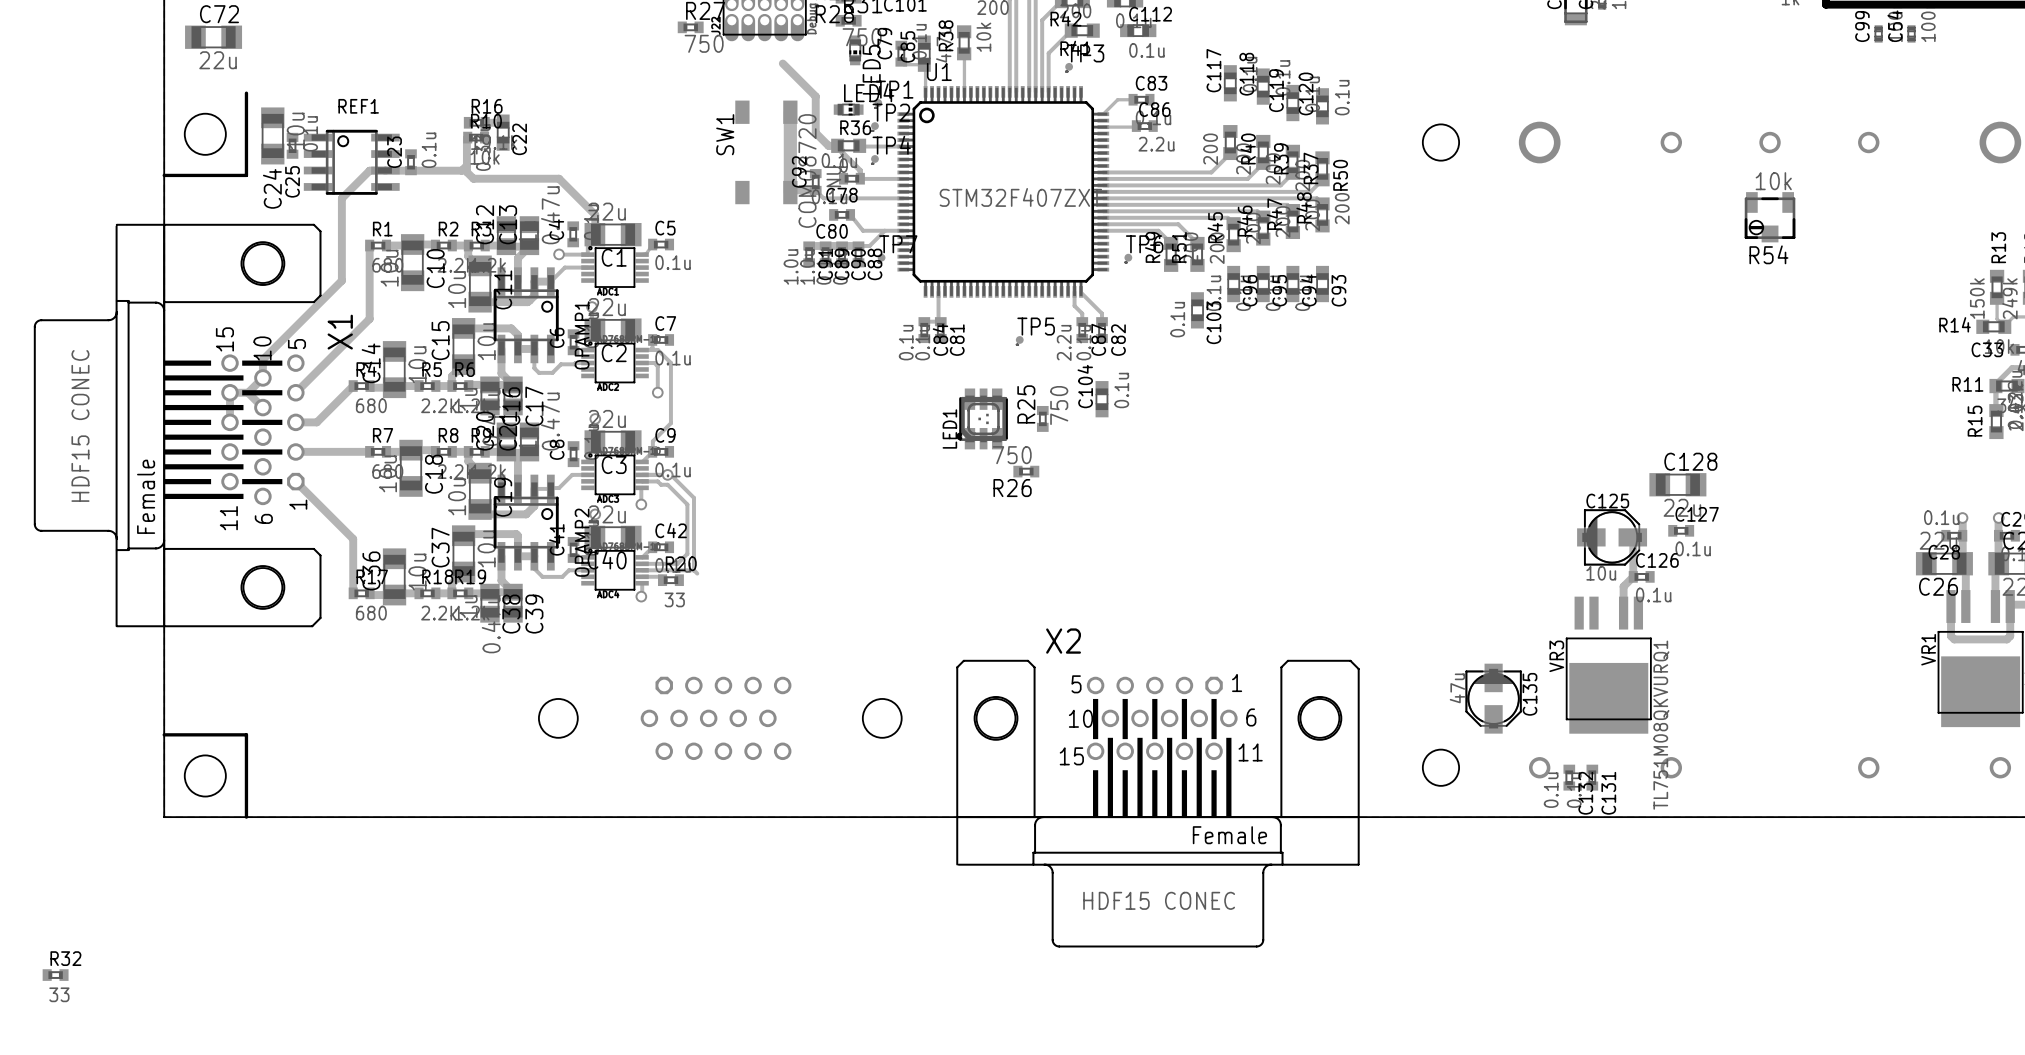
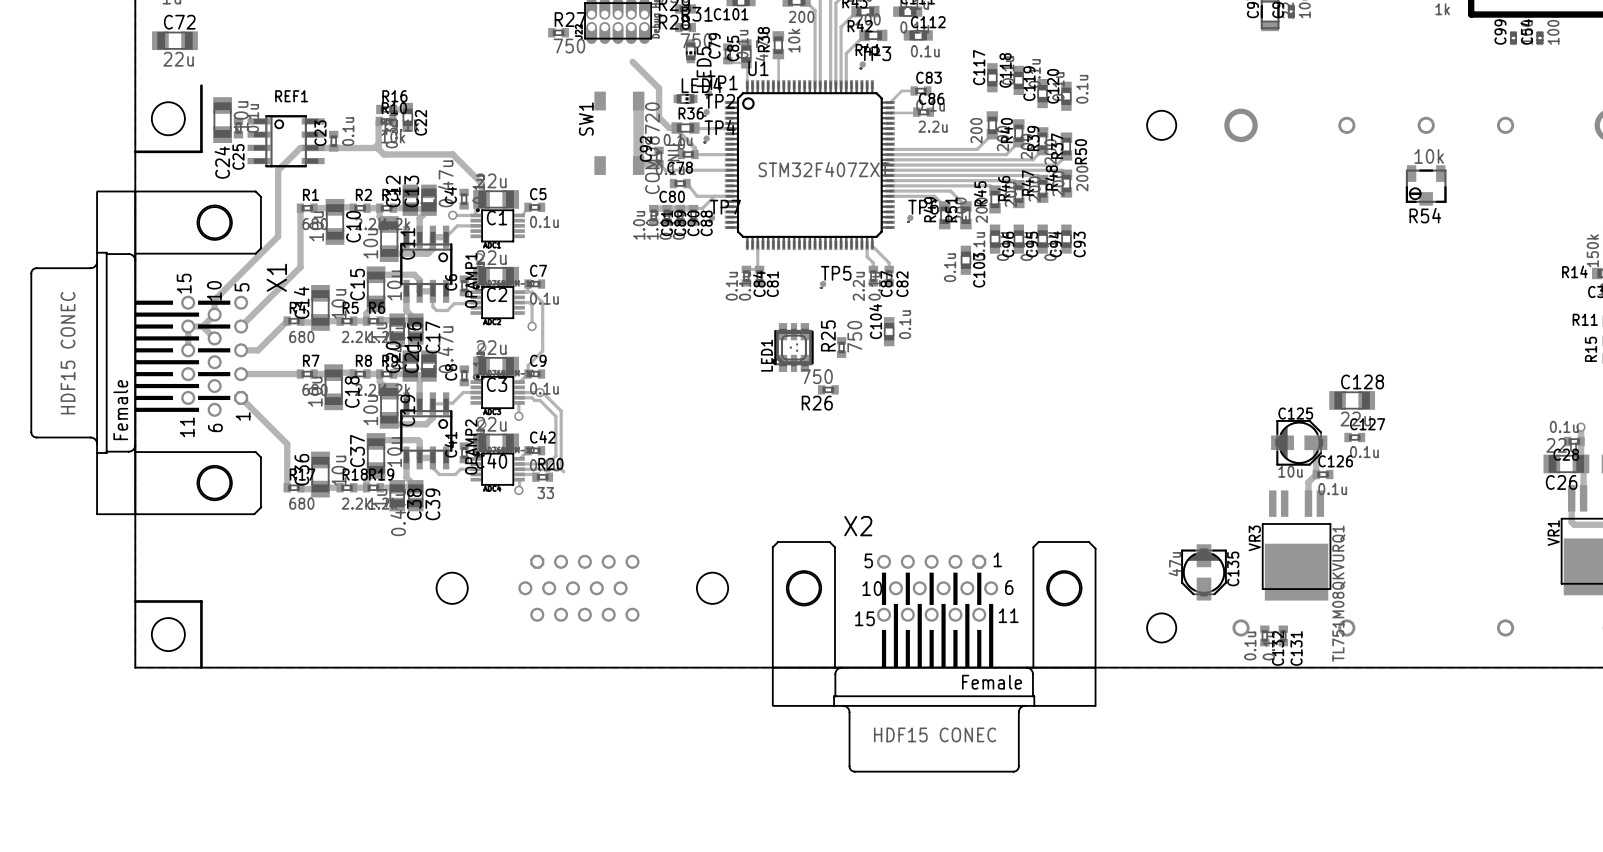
R32: 33 (55, 975) -> none

